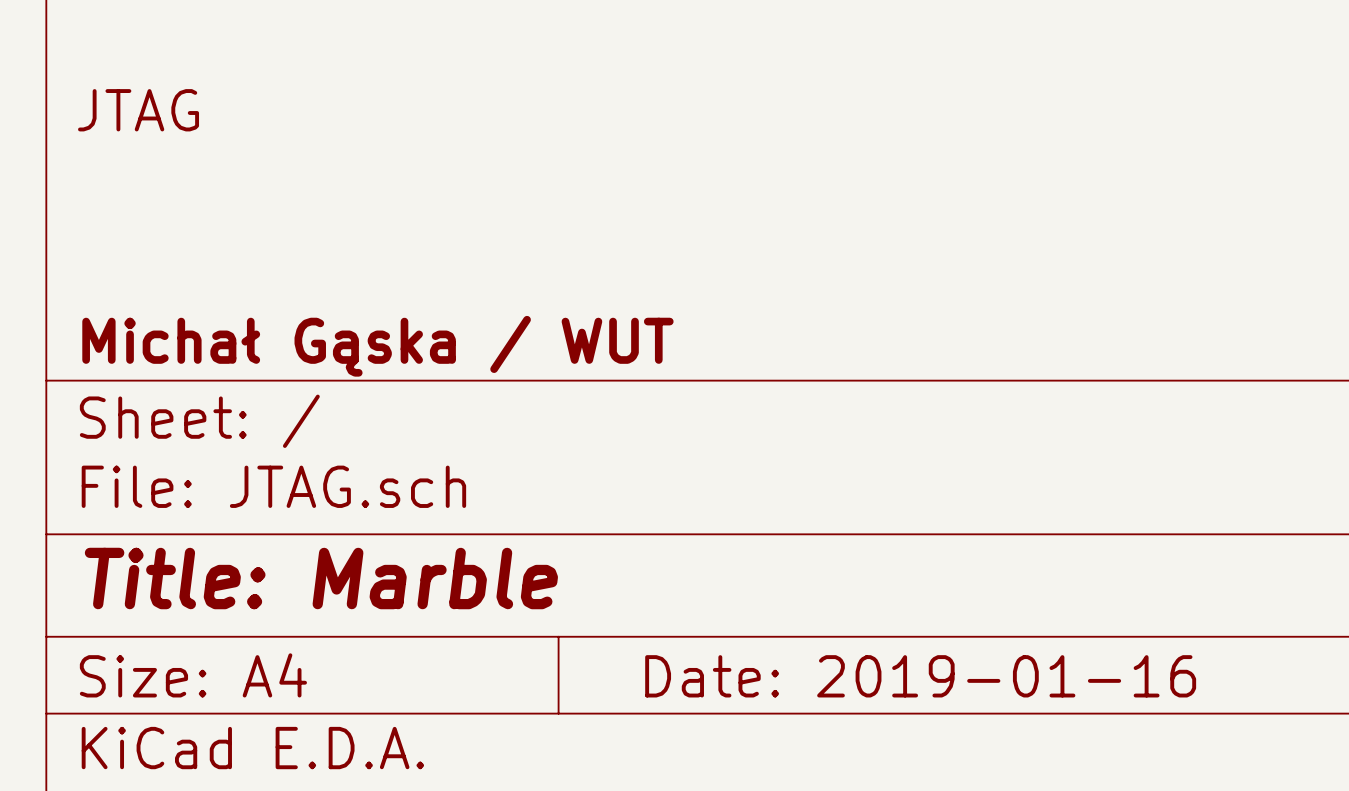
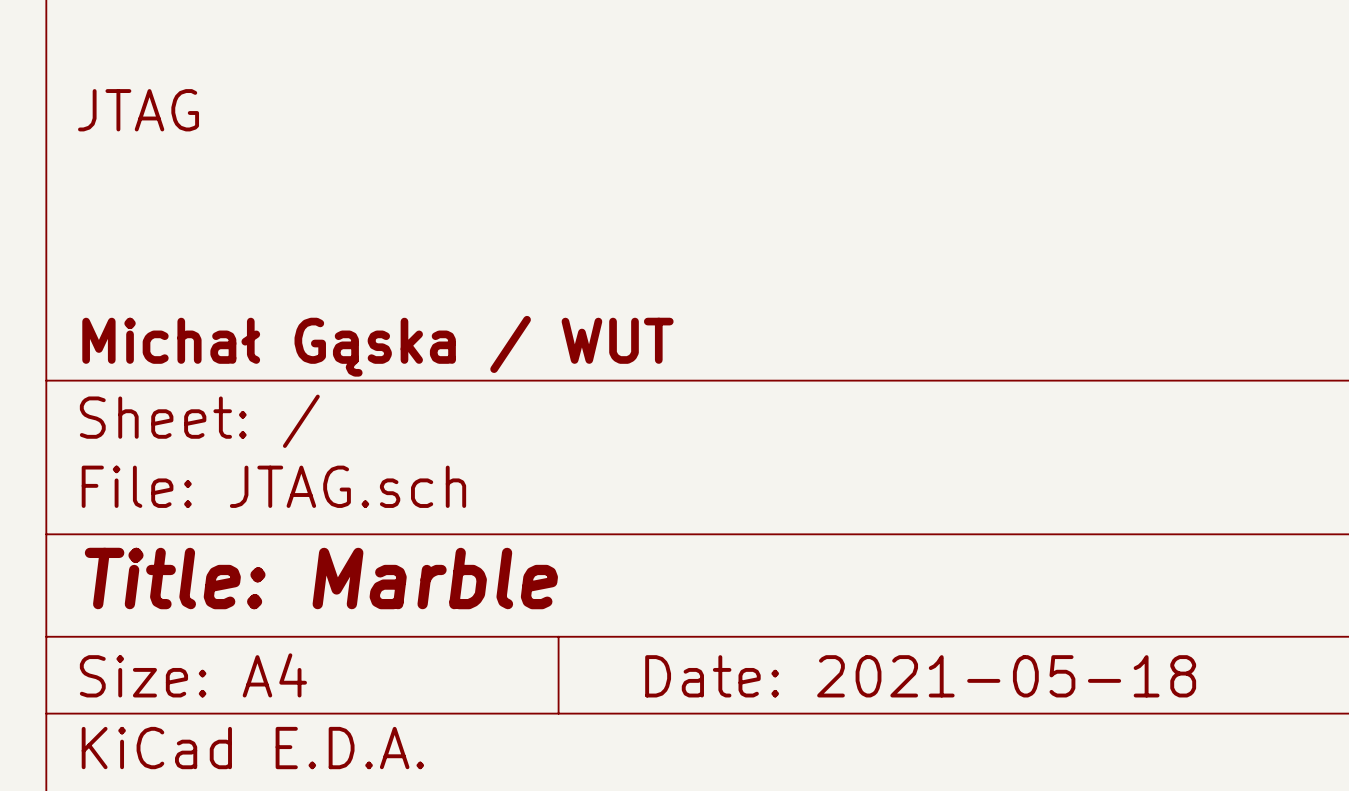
title block: Date: 2019-01-16 (920, 676) -> Date: 2021-05-18 (920, 676)

